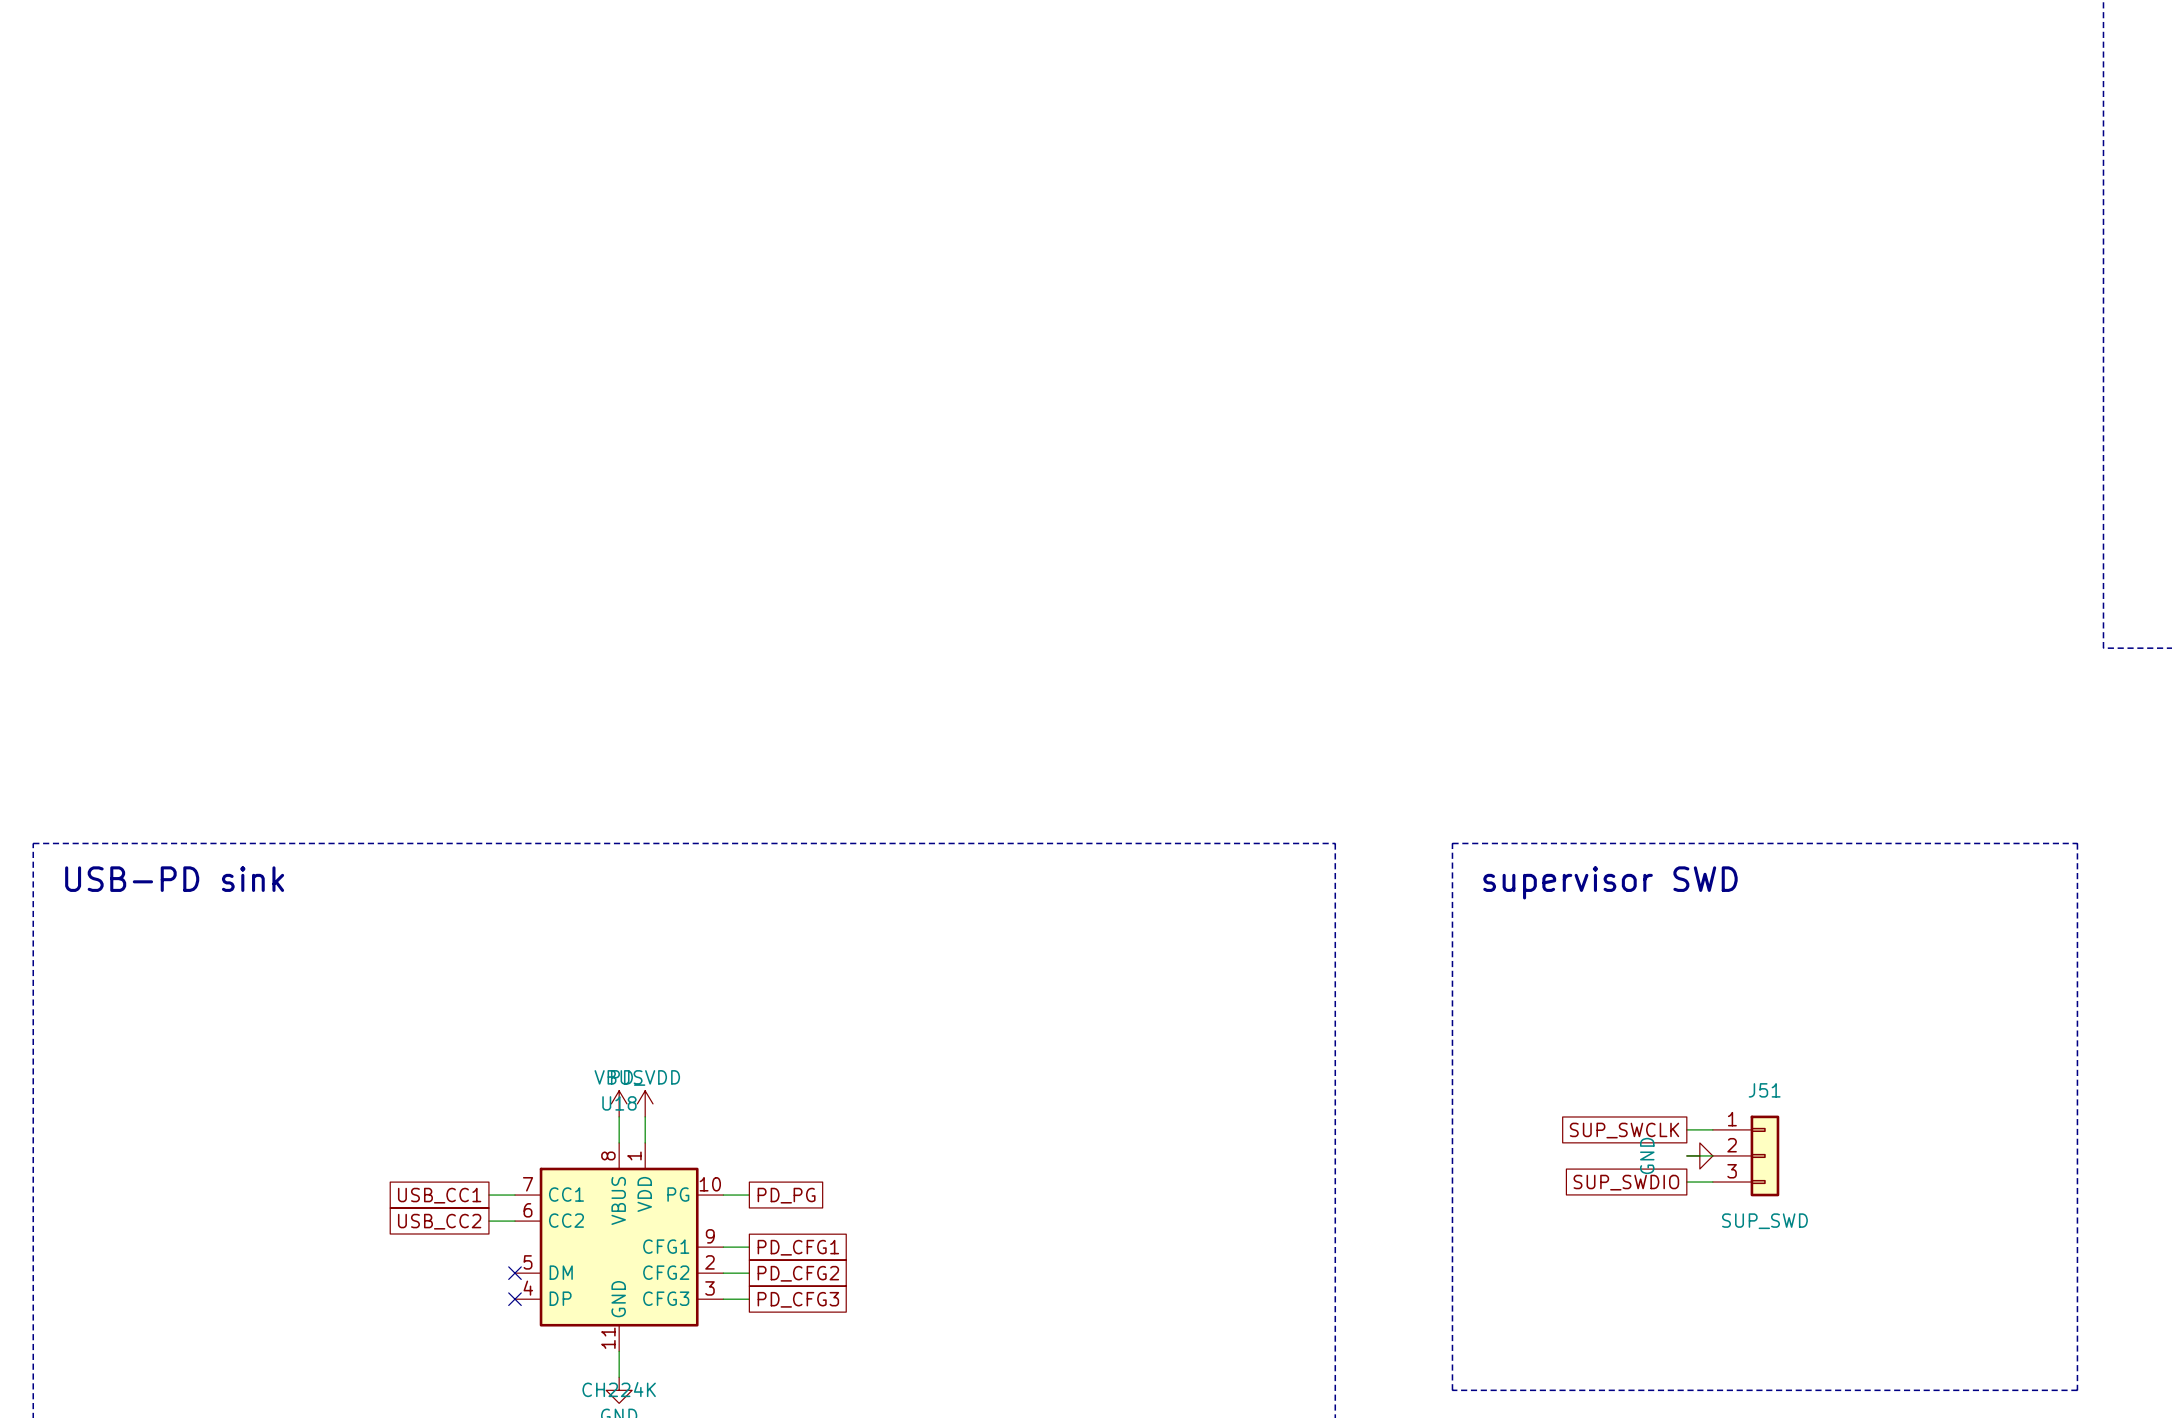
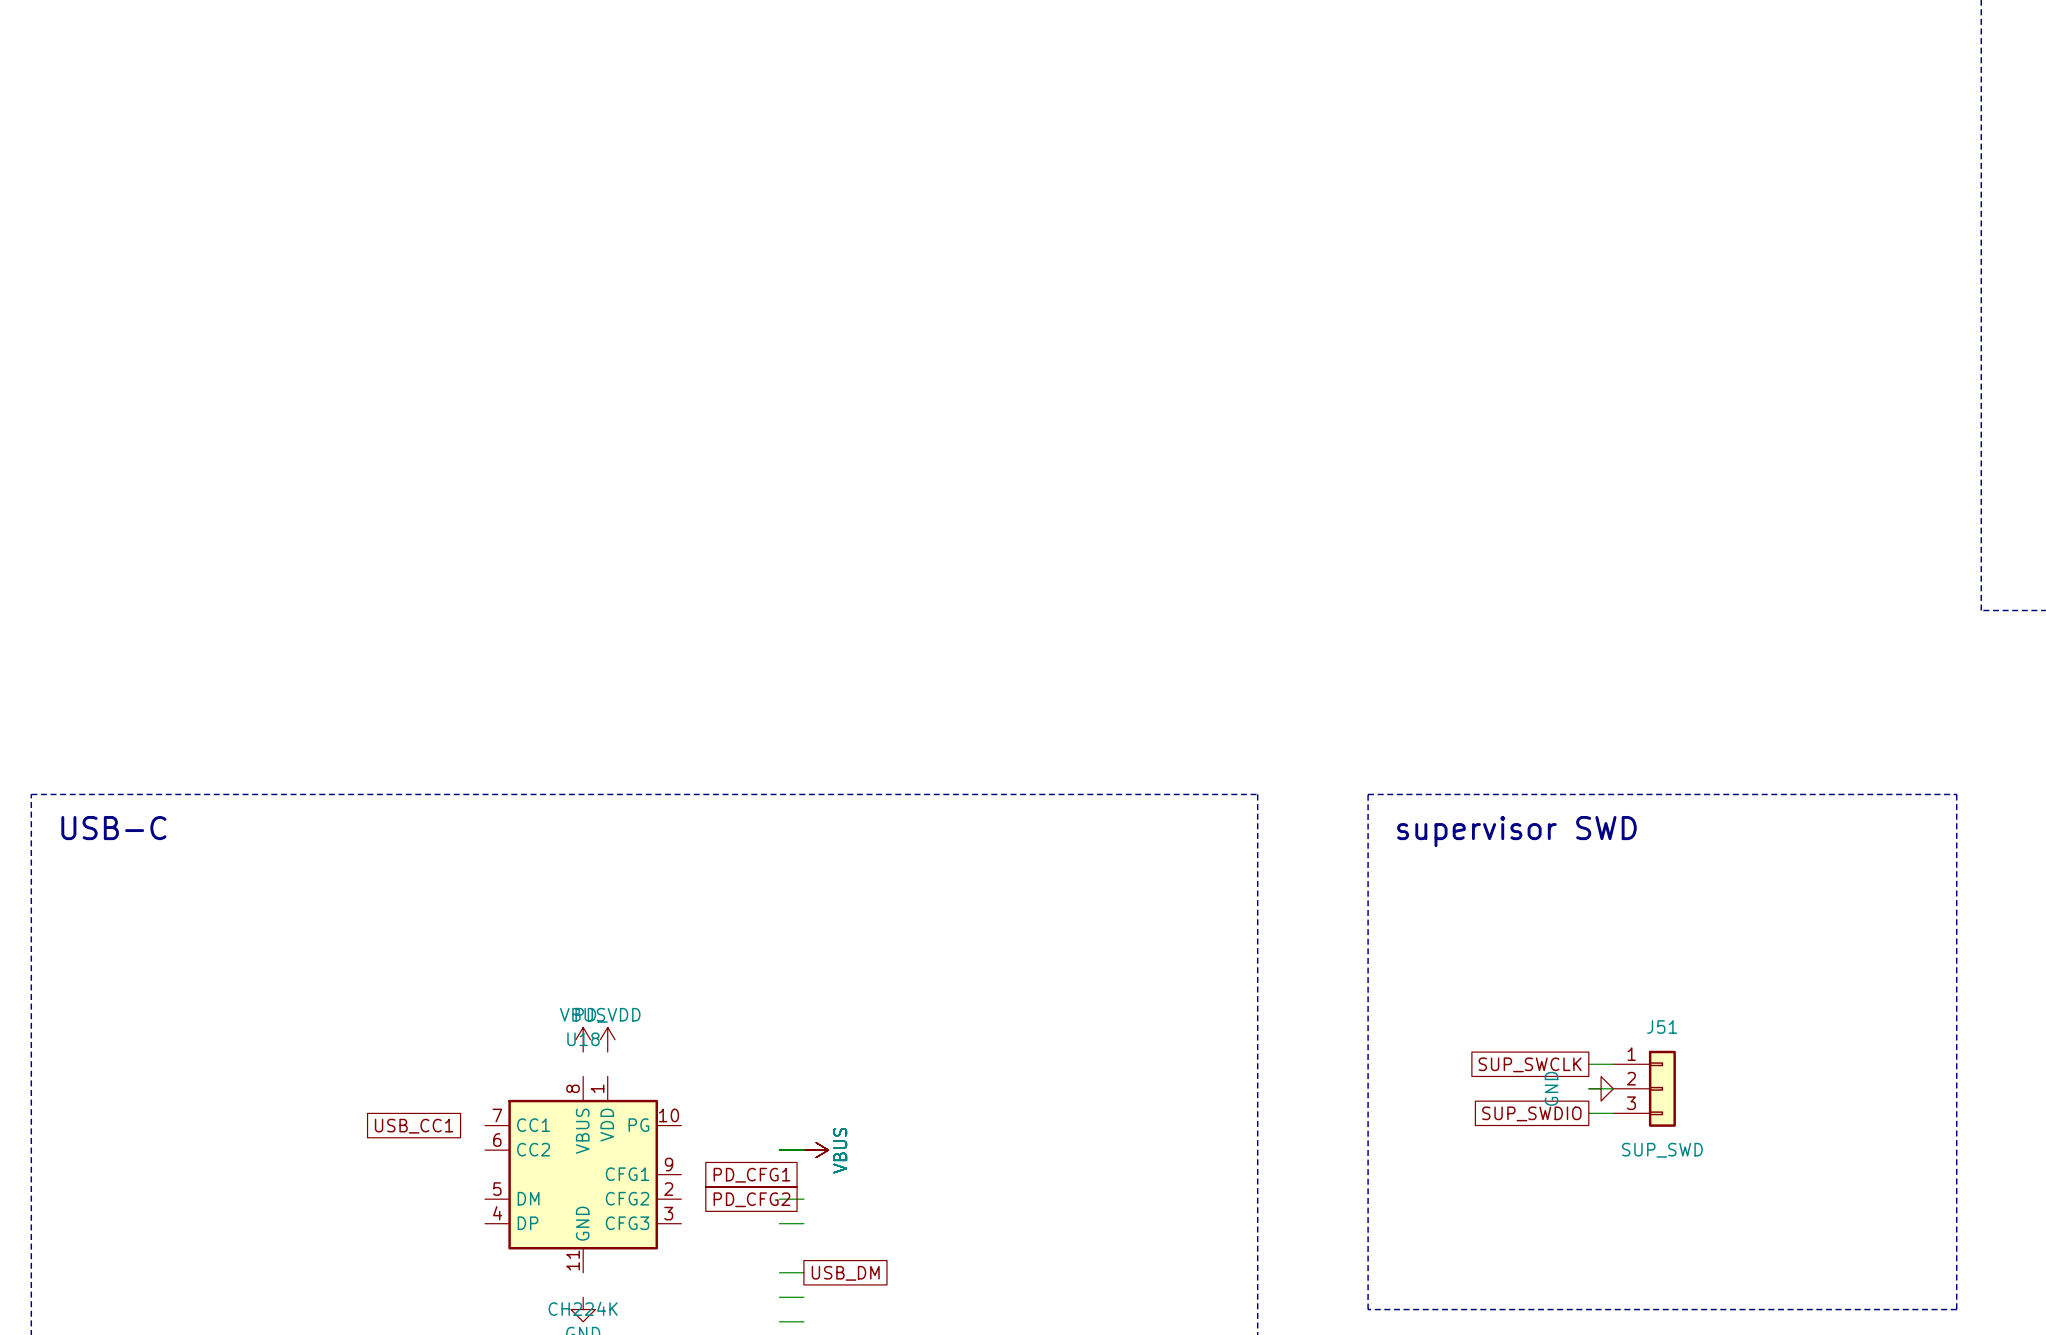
text: USB-PD sink (174, 879) -> USB-C (113, 828)
wire: (619, 1116) (619, 1142) -> none
wire: (645, 1116) (645, 1142) -> none
wire: (488, 1195) (514, 1195) -> none
wire: (723, 1195) (749, 1195) -> (779, 1223) (803, 1223)
global label: PD_PG (786, 1195) -> none
global label: USB_CC2 (439, 1221) -> none
wire: (488, 1221) (514, 1221) -> none
wire: none -> (779, 1150) (803, 1150)
power symbol: none -> VBUS (816, 1150)
wire: (723, 1247) (749, 1247) -> (779, 1272) (803, 1272)
no-connect mark: (514, 1273) -> none
wire: (723, 1273) (749, 1273) -> (779, 1297) (803, 1297)
wire: none -> (779, 1199) (803, 1199)
no-connect mark: (514, 1299) -> none
wire: (723, 1299) (749, 1299) -> (779, 1321) (803, 1321)
global label: PD_CFG3 (798, 1299) -> none
wire: (619, 1351) (619, 1377) -> none
global label: none -> USB_DM (845, 1273)

